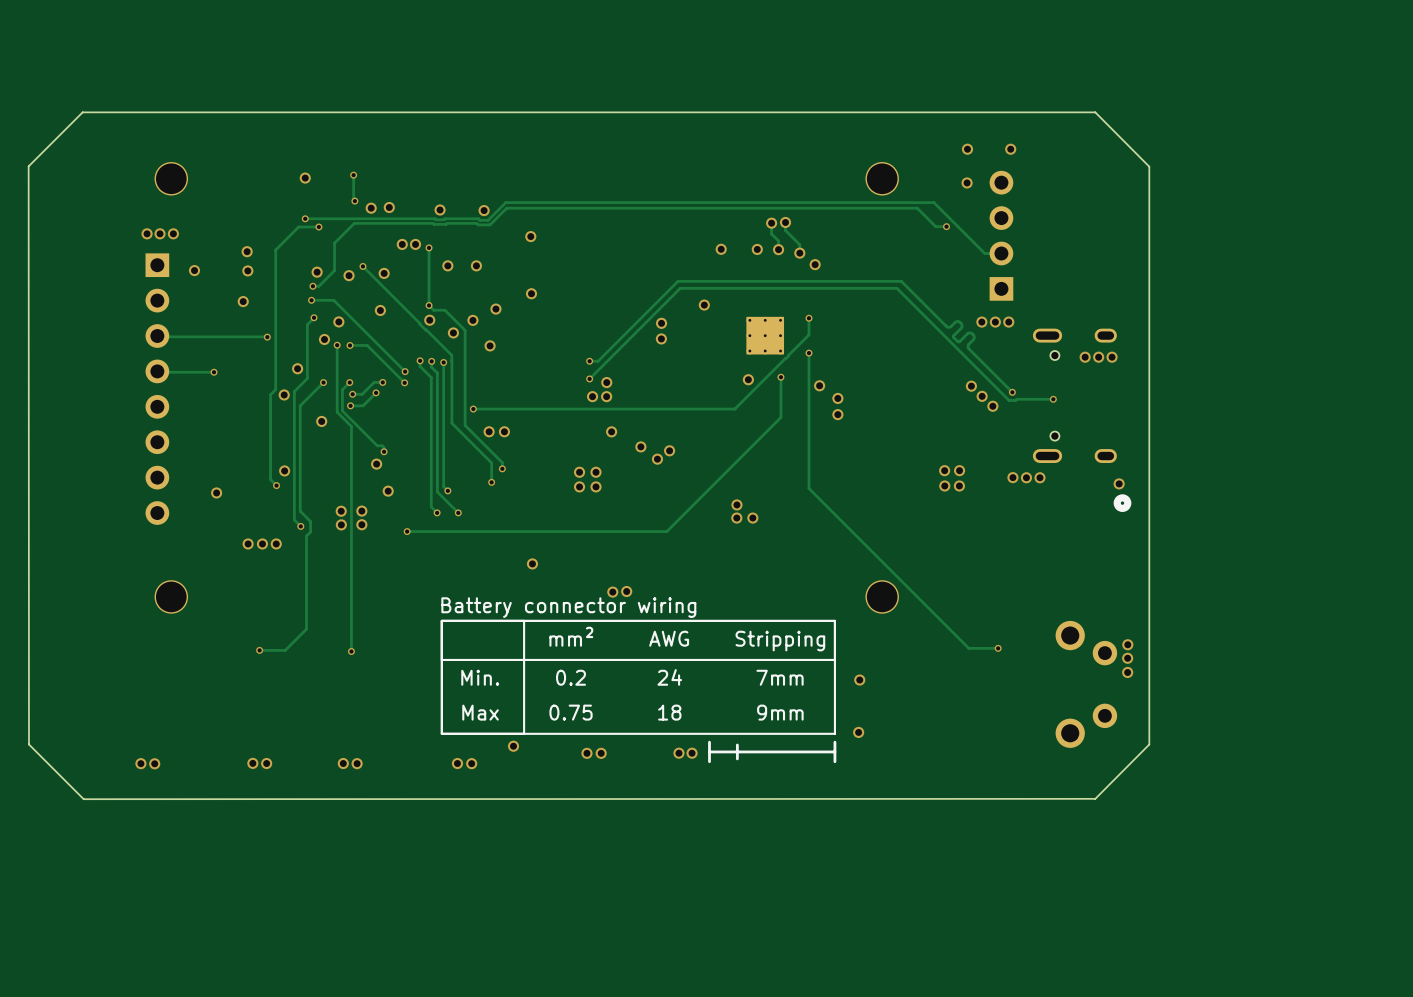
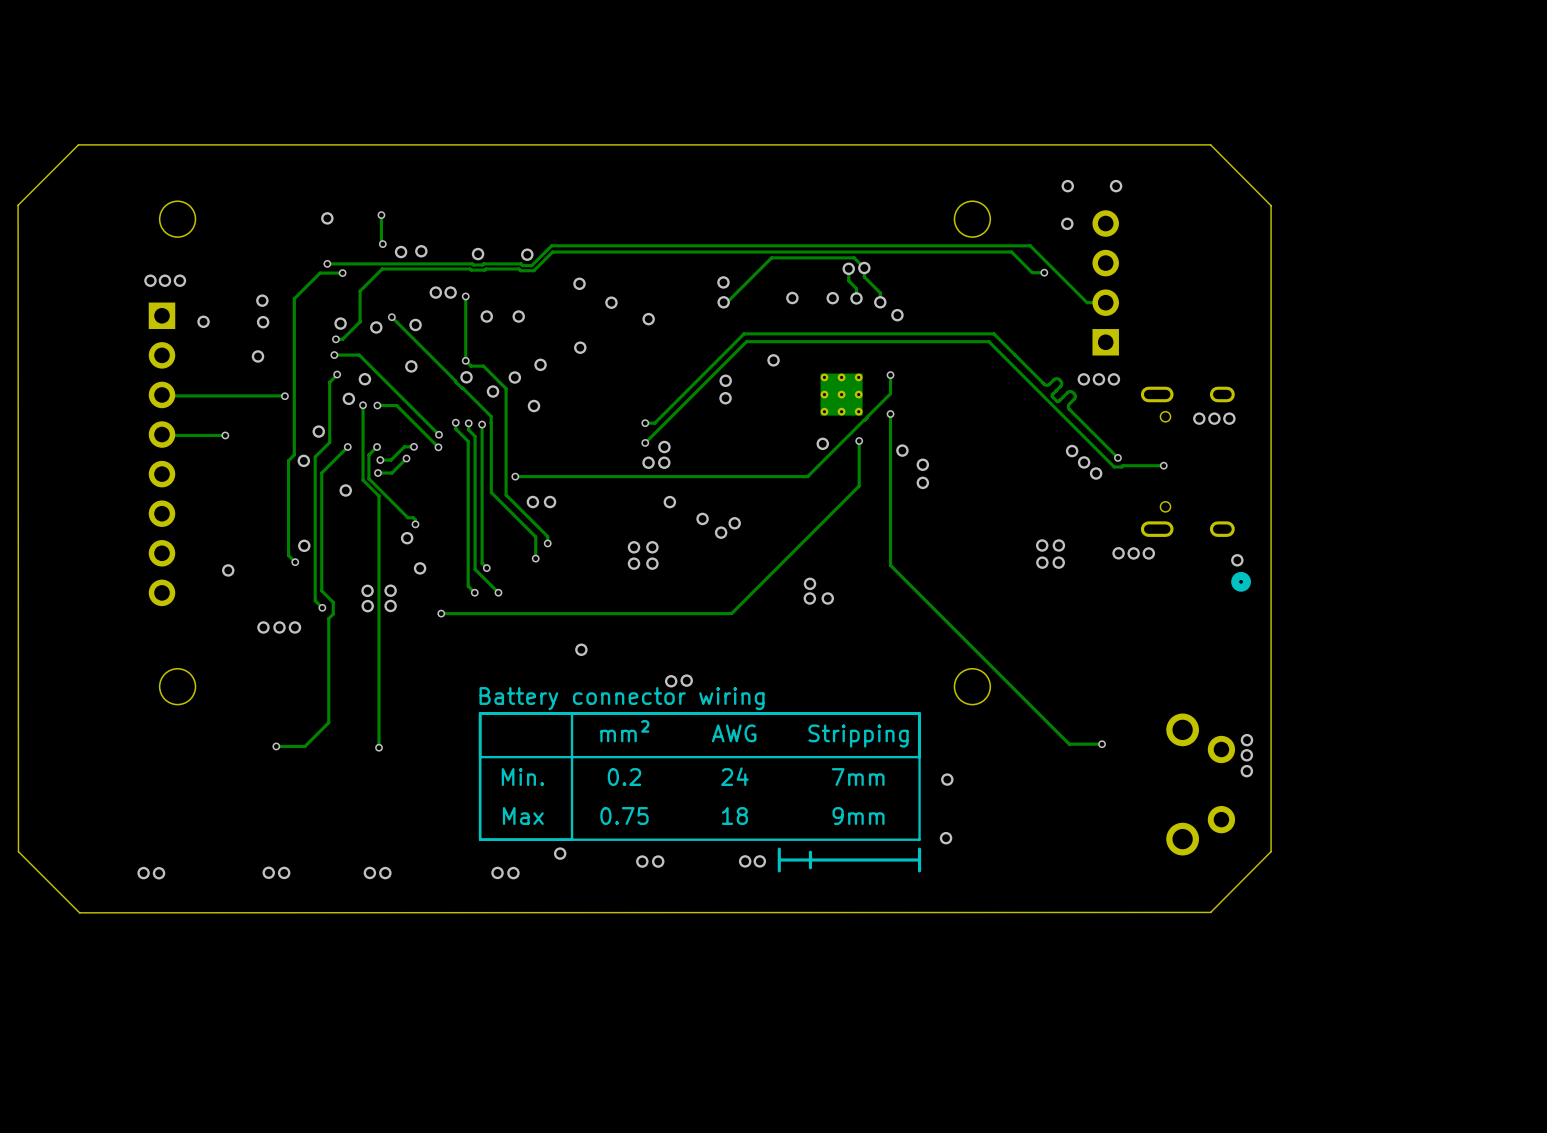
track: none -> (864, 268) (854, 257) (771, 257) (727, 302) (723, 302)
via: none -> (723, 282)
via: none -> (611, 302)
via: none -> (723, 302)
via: none -> (648, 319)

